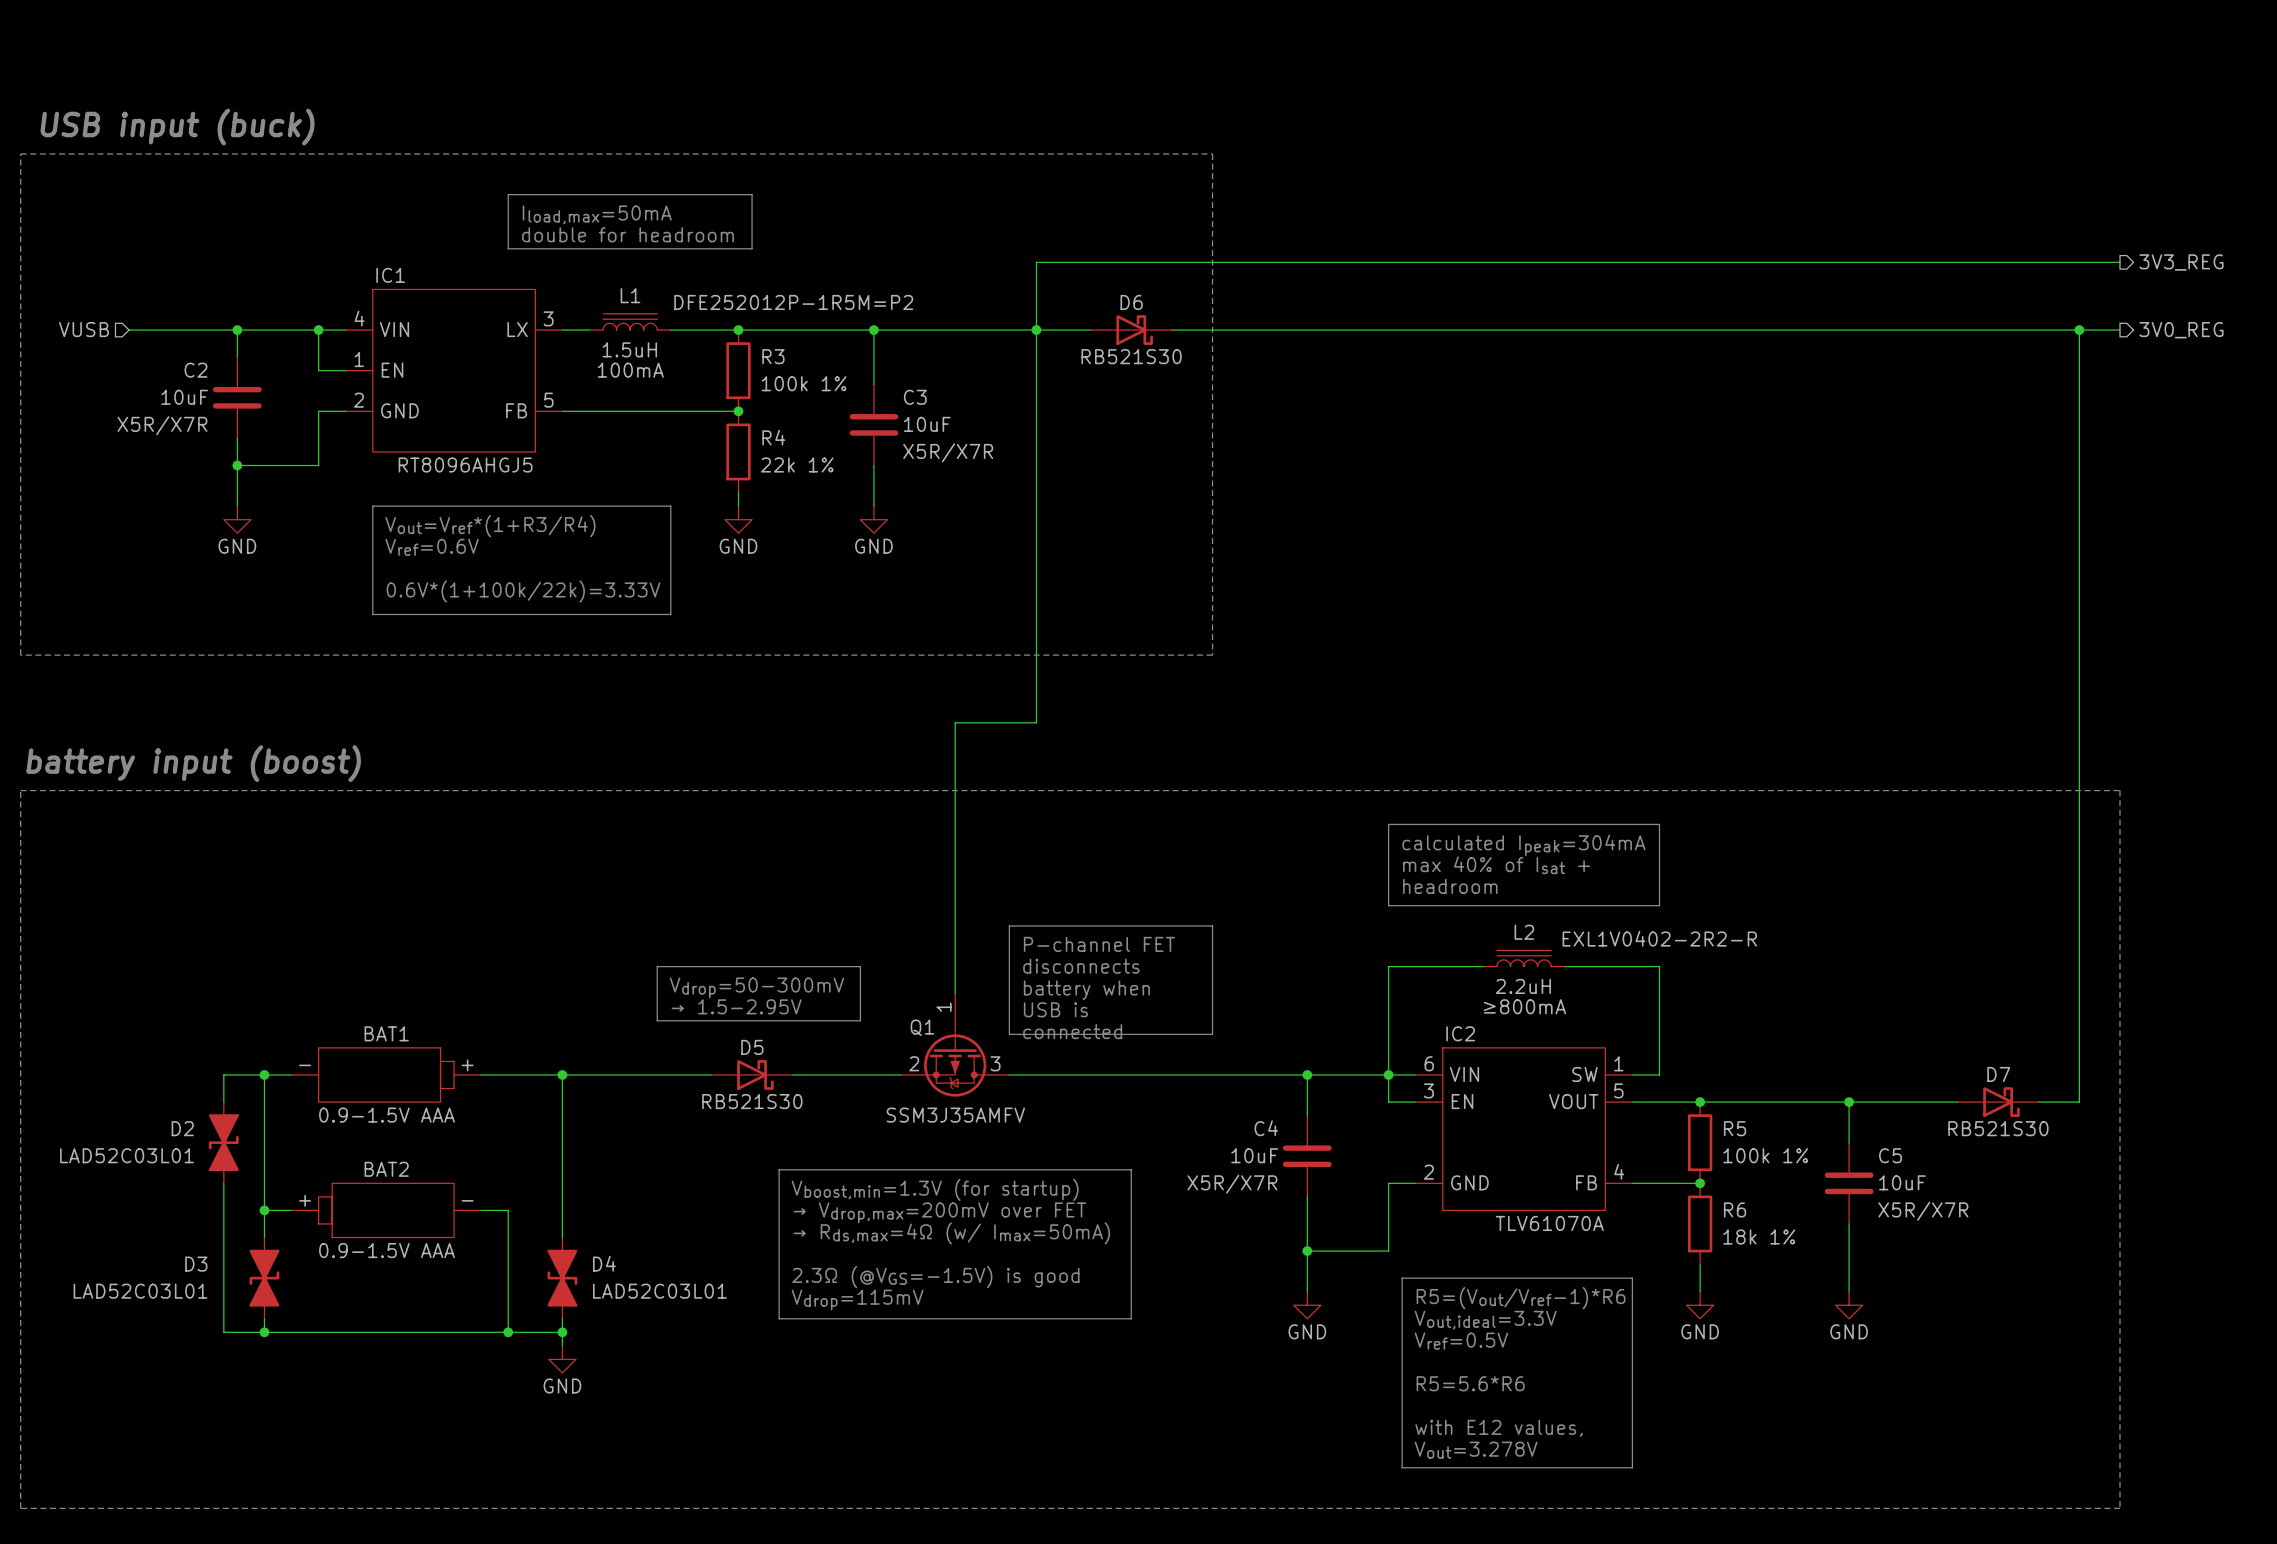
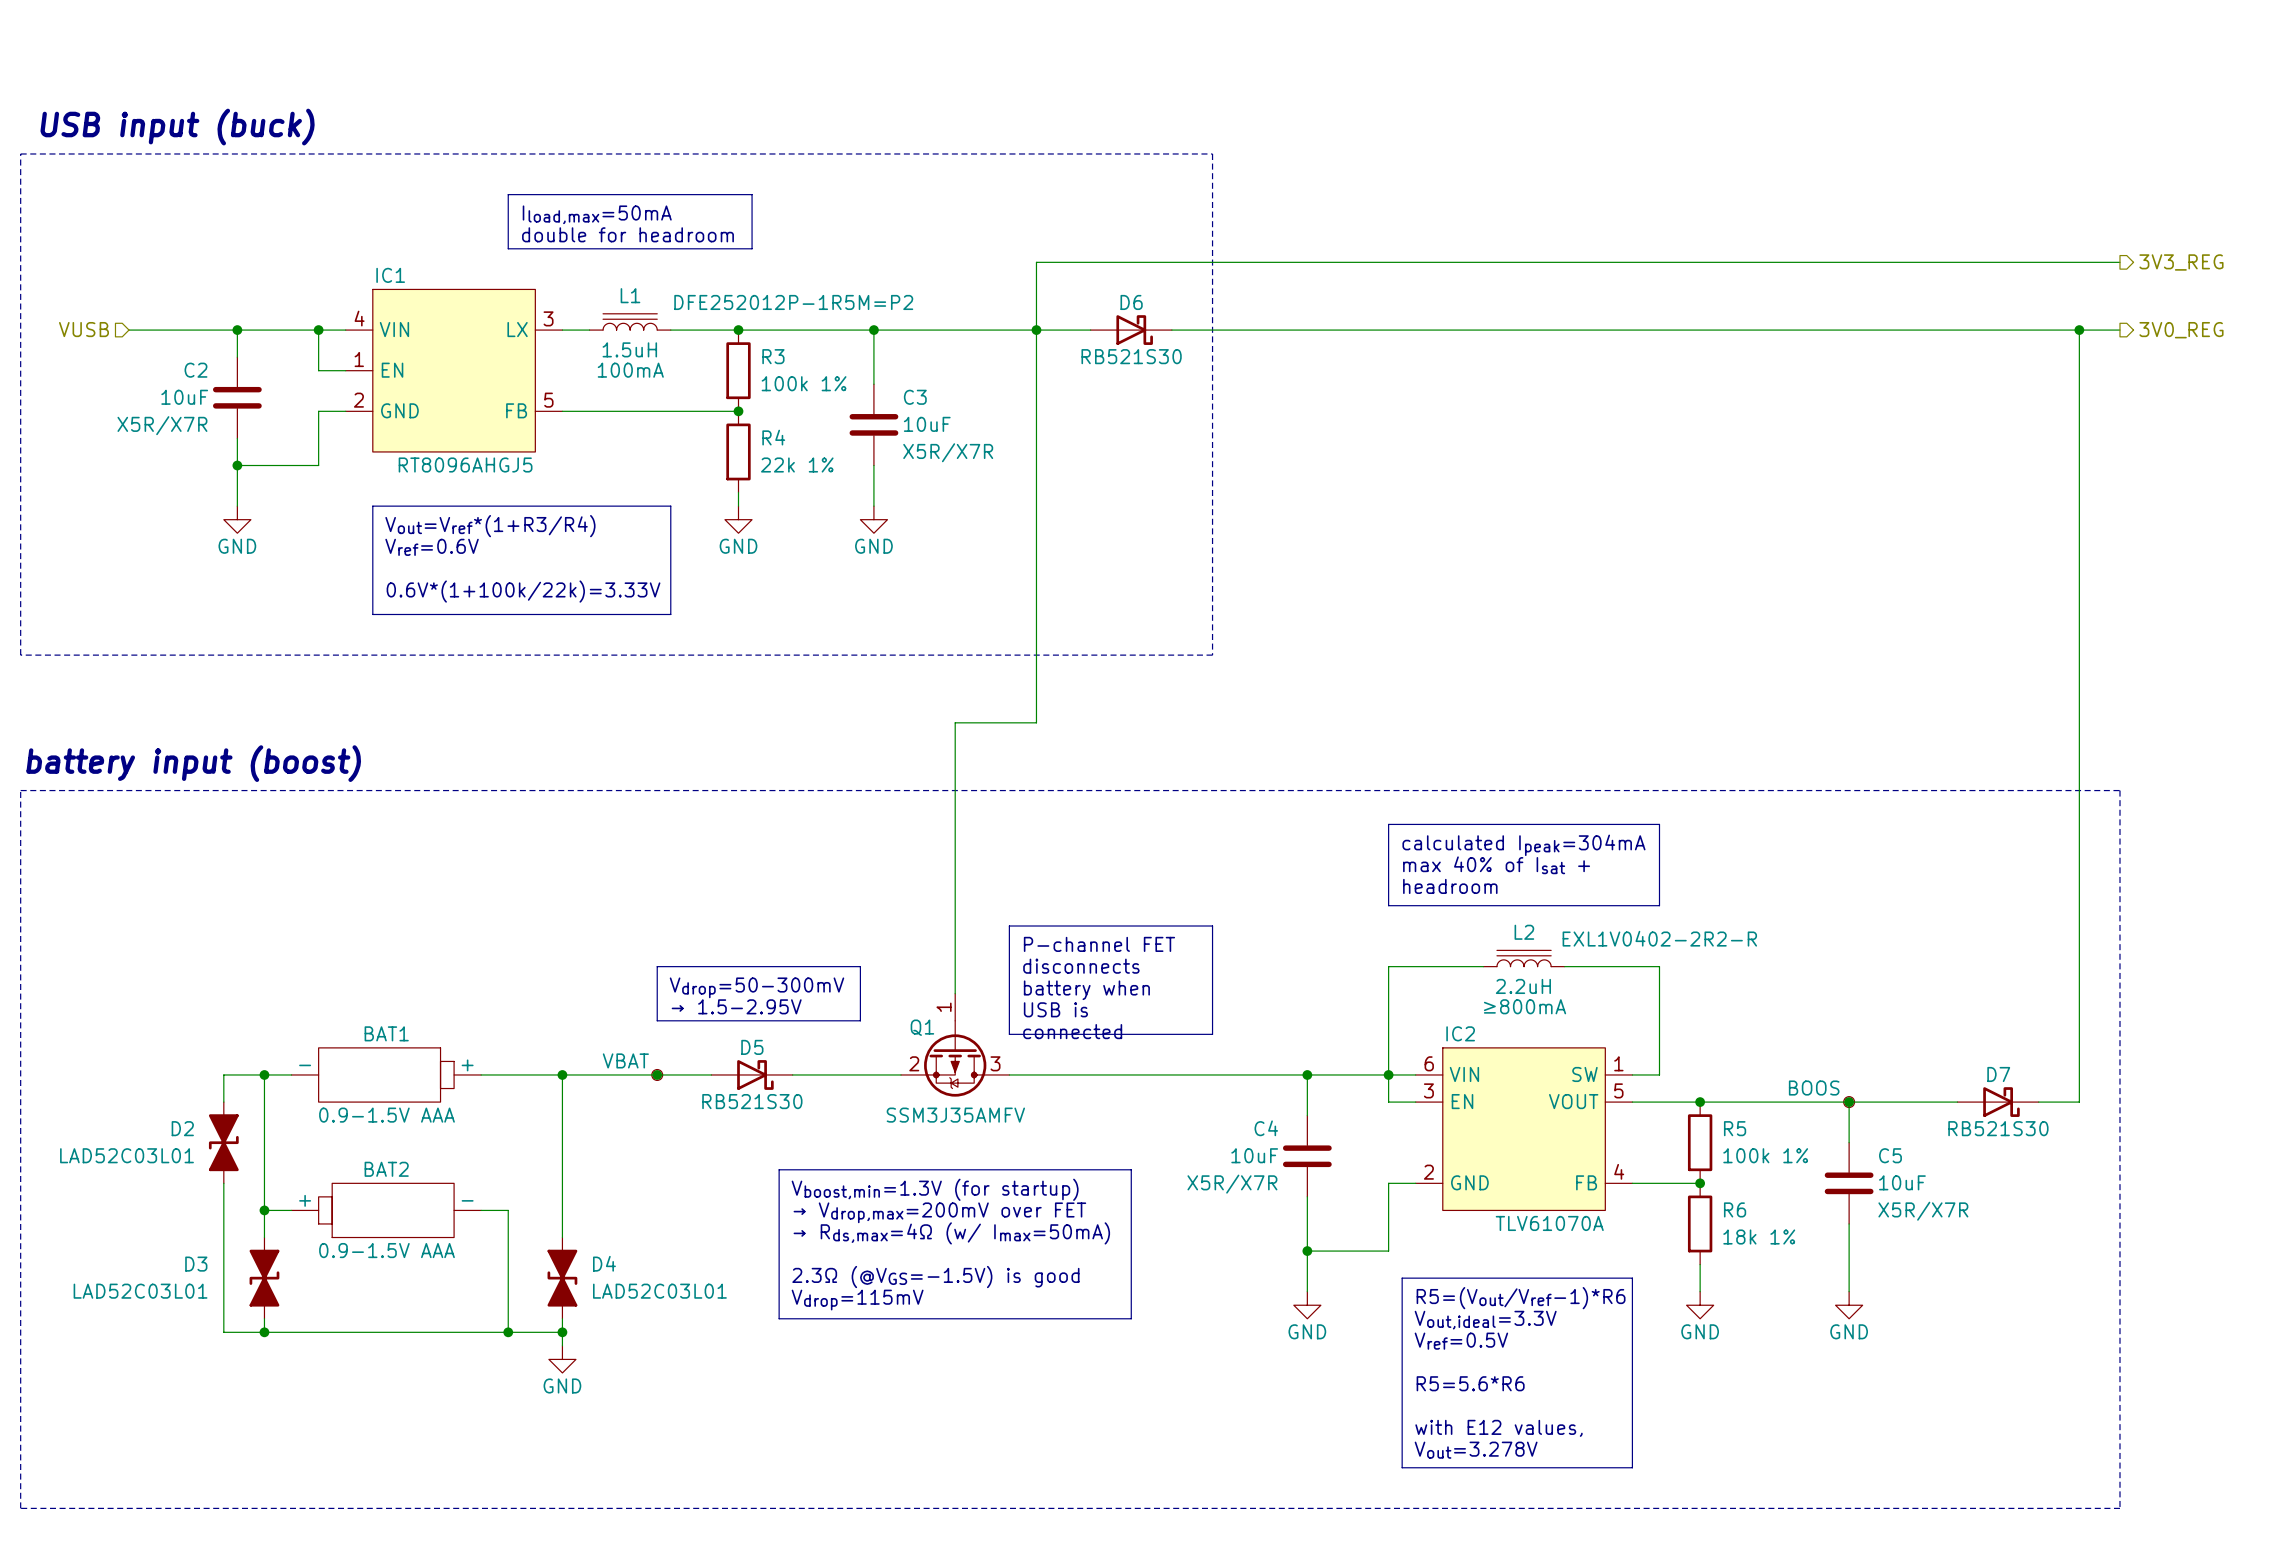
junction: none -> (657, 1074)
part: none -> VBAT (657, 1074)
part: none -> BOOS (1849, 1102)

